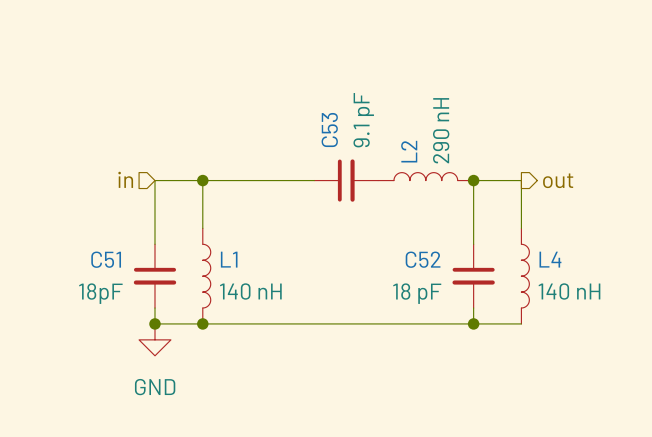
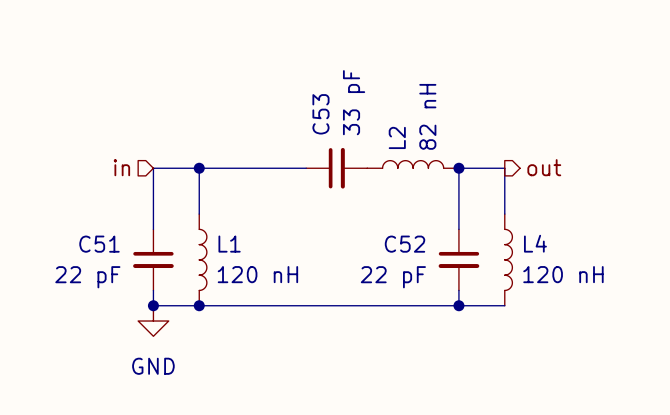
C53 value: 9.1 pF (363, 120) -> 33 pF (354, 102)
L2 value: 290 nH (441, 130) -> 82 nH (427, 116)
L1 value: 140 nH (250, 291) -> 120 nH (257, 274)
L4 value: 140 nH (569, 291) -> 120 nH (563, 274)
C51 value: 18pF (100, 293) -> 22 pF (87, 277)
C52 value: 18 pF (417, 293) -> 22 pF (393, 277)

